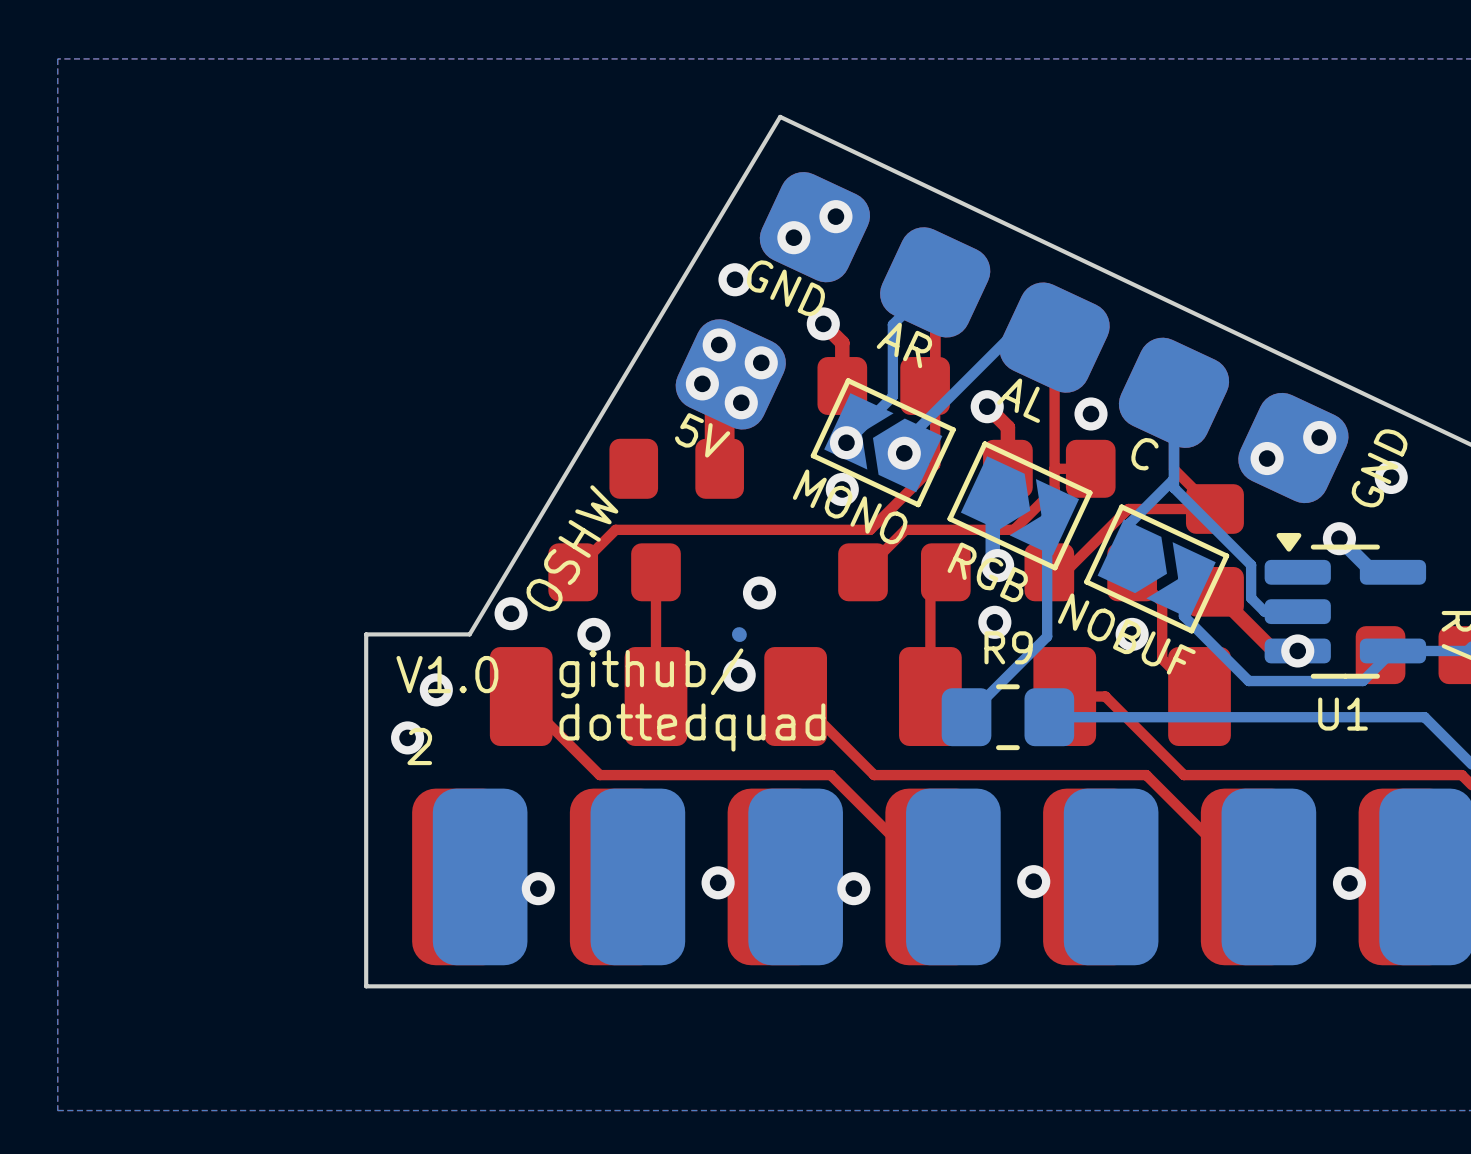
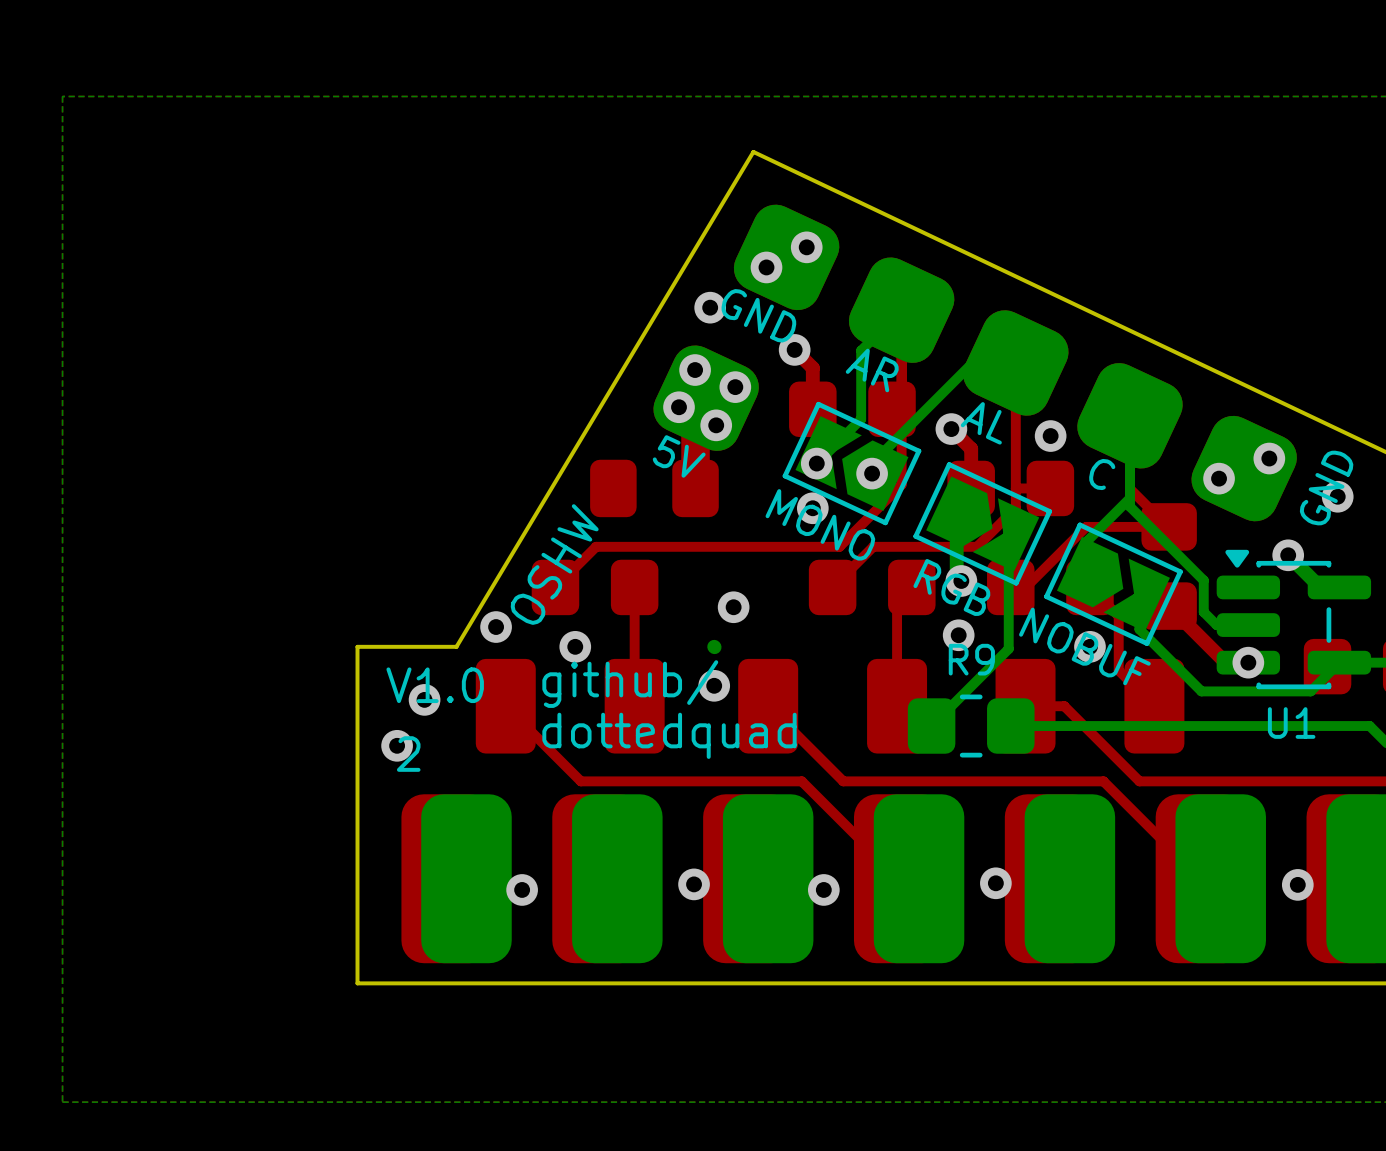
U1 footprint: [1264, 532, 1427, 679] -> [1216, 549, 1372, 690]

